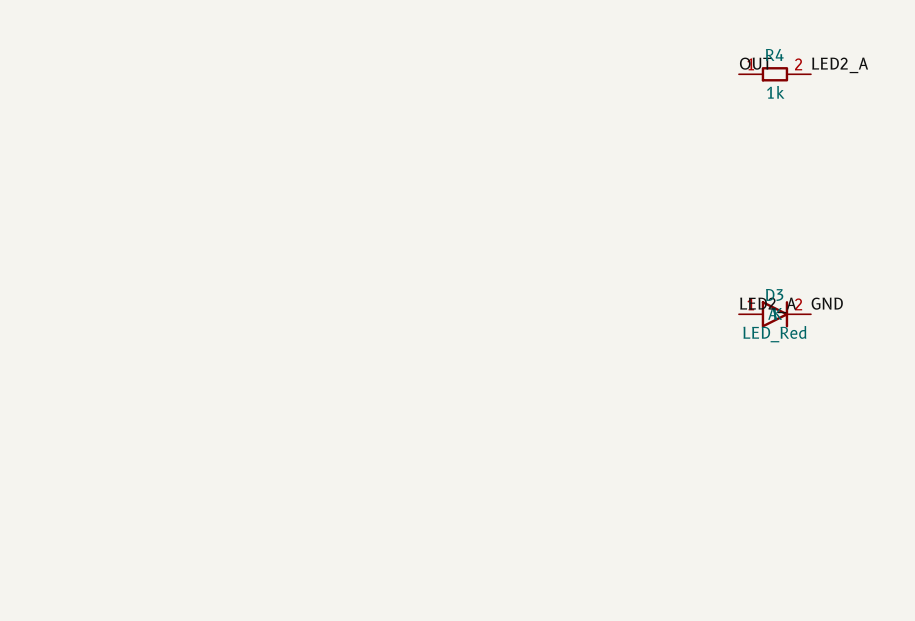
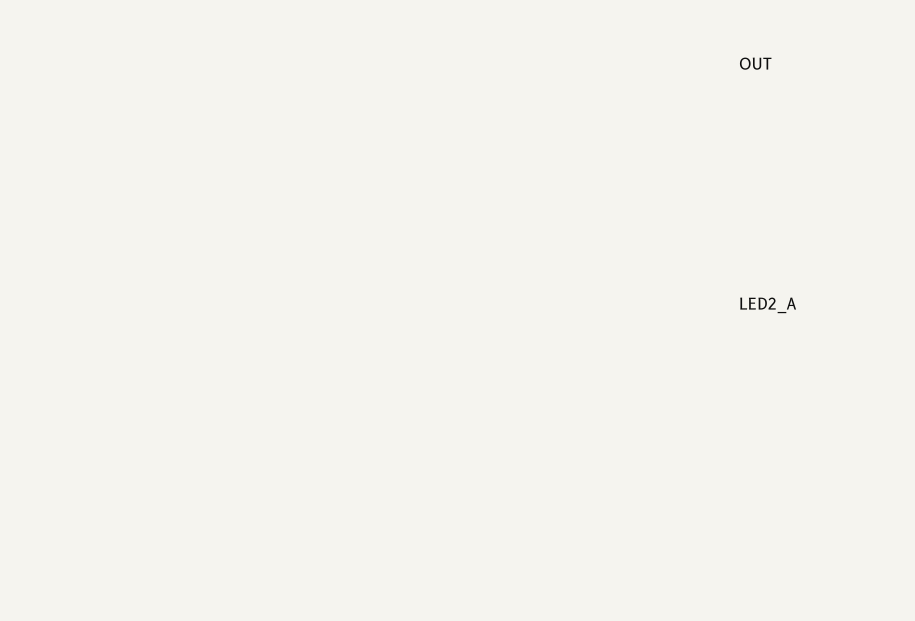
label: LED2_A (840, 65) -> none
R4: 1k (774, 74) -> none
label: GND (827, 303) -> none
D3: LED_Red (774, 314) -> none

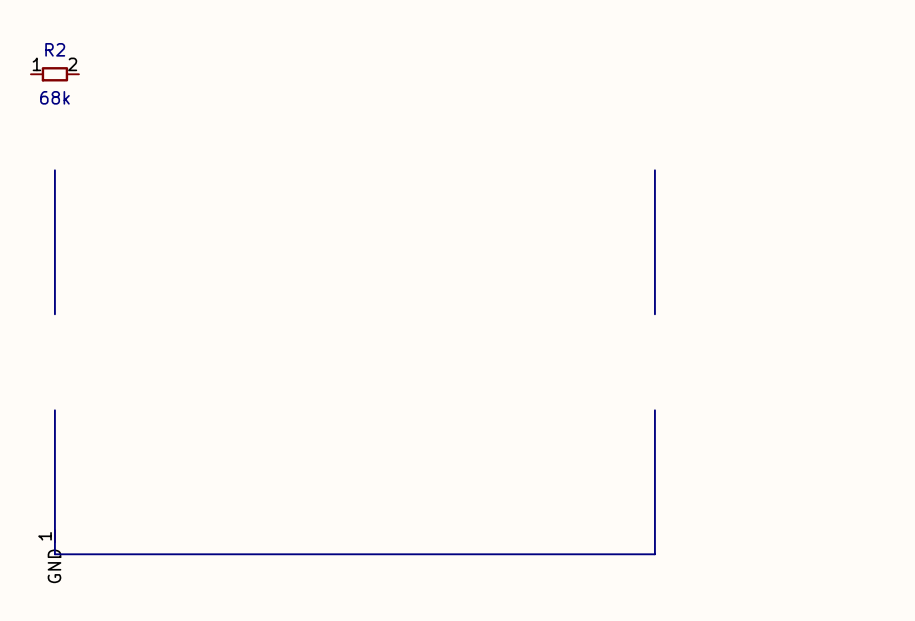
label: OUT (755, 63) -> none
R2: none -> 68k (54, 74)
wire: none -> (54, 170) (54, 314)
wire: none -> (654, 170) (654, 314)
label: LED2_A (768, 305) -> none
wire: none -> (54, 410) (54, 554) (654, 554) (654, 410)
power symbol: none -> (54, 536)

